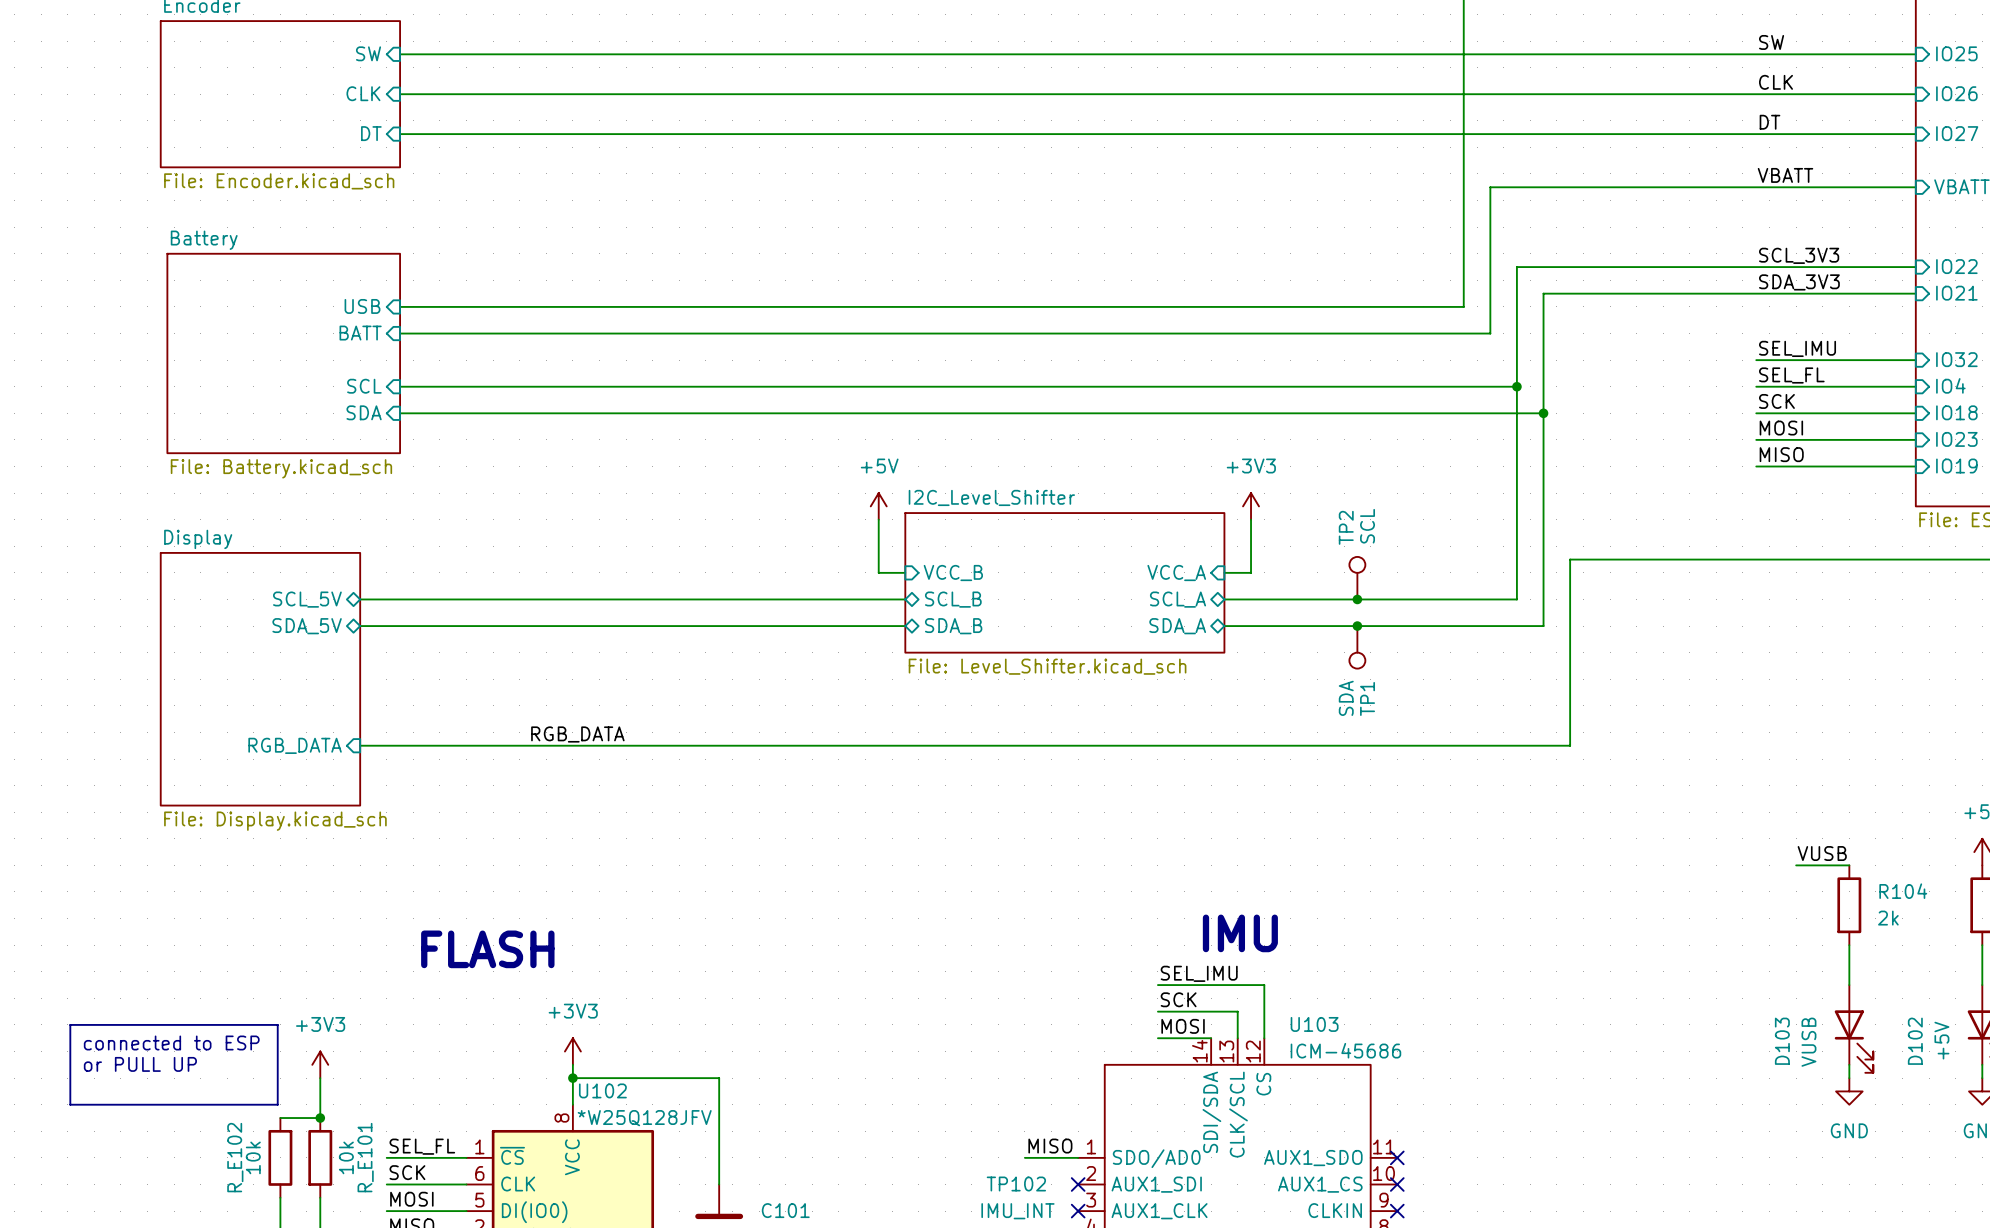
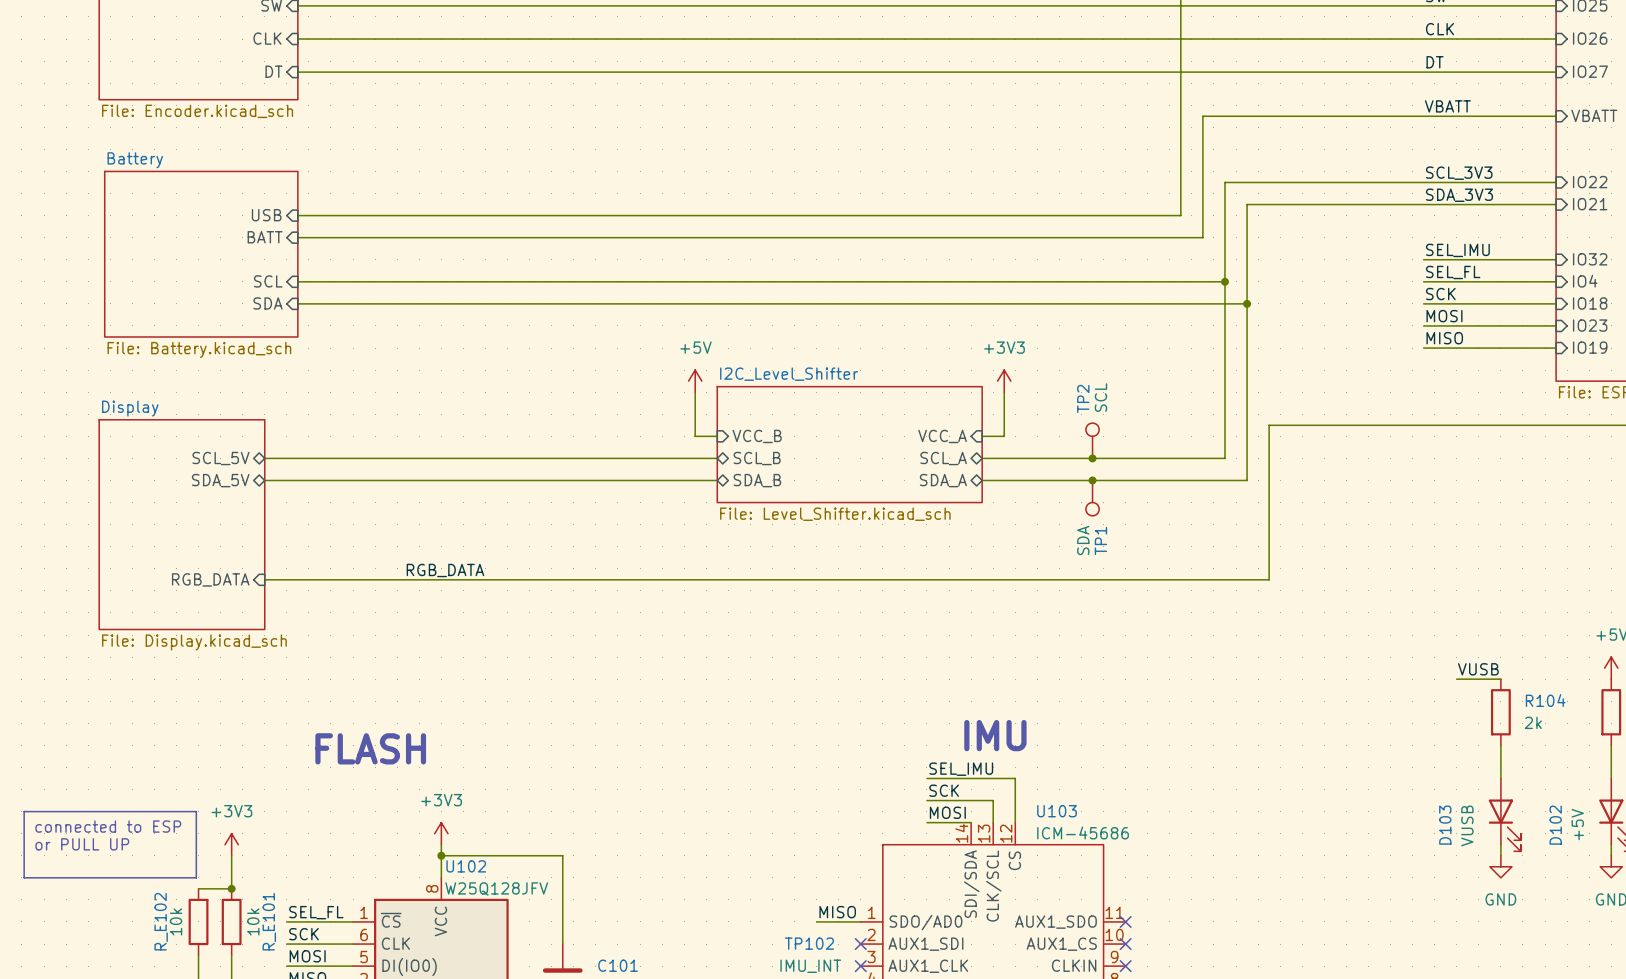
U102 value: *W25Q128JFV (644, 1118) -> W25Q128JFV (496, 888)

